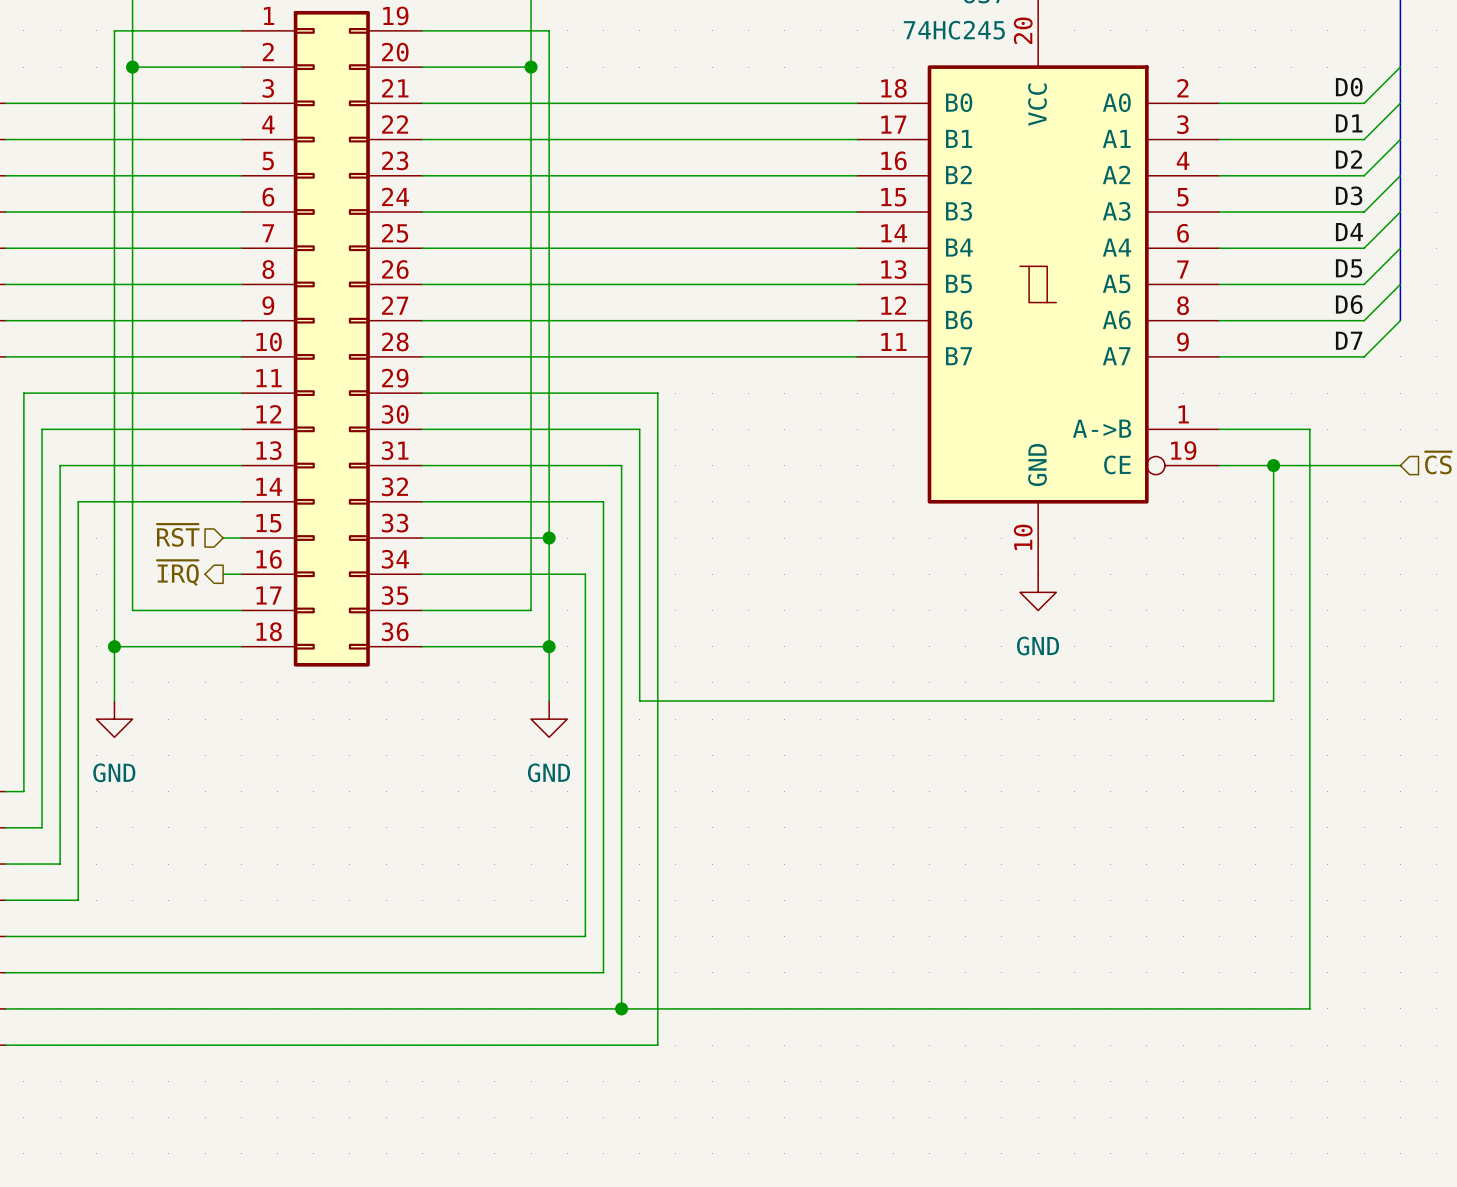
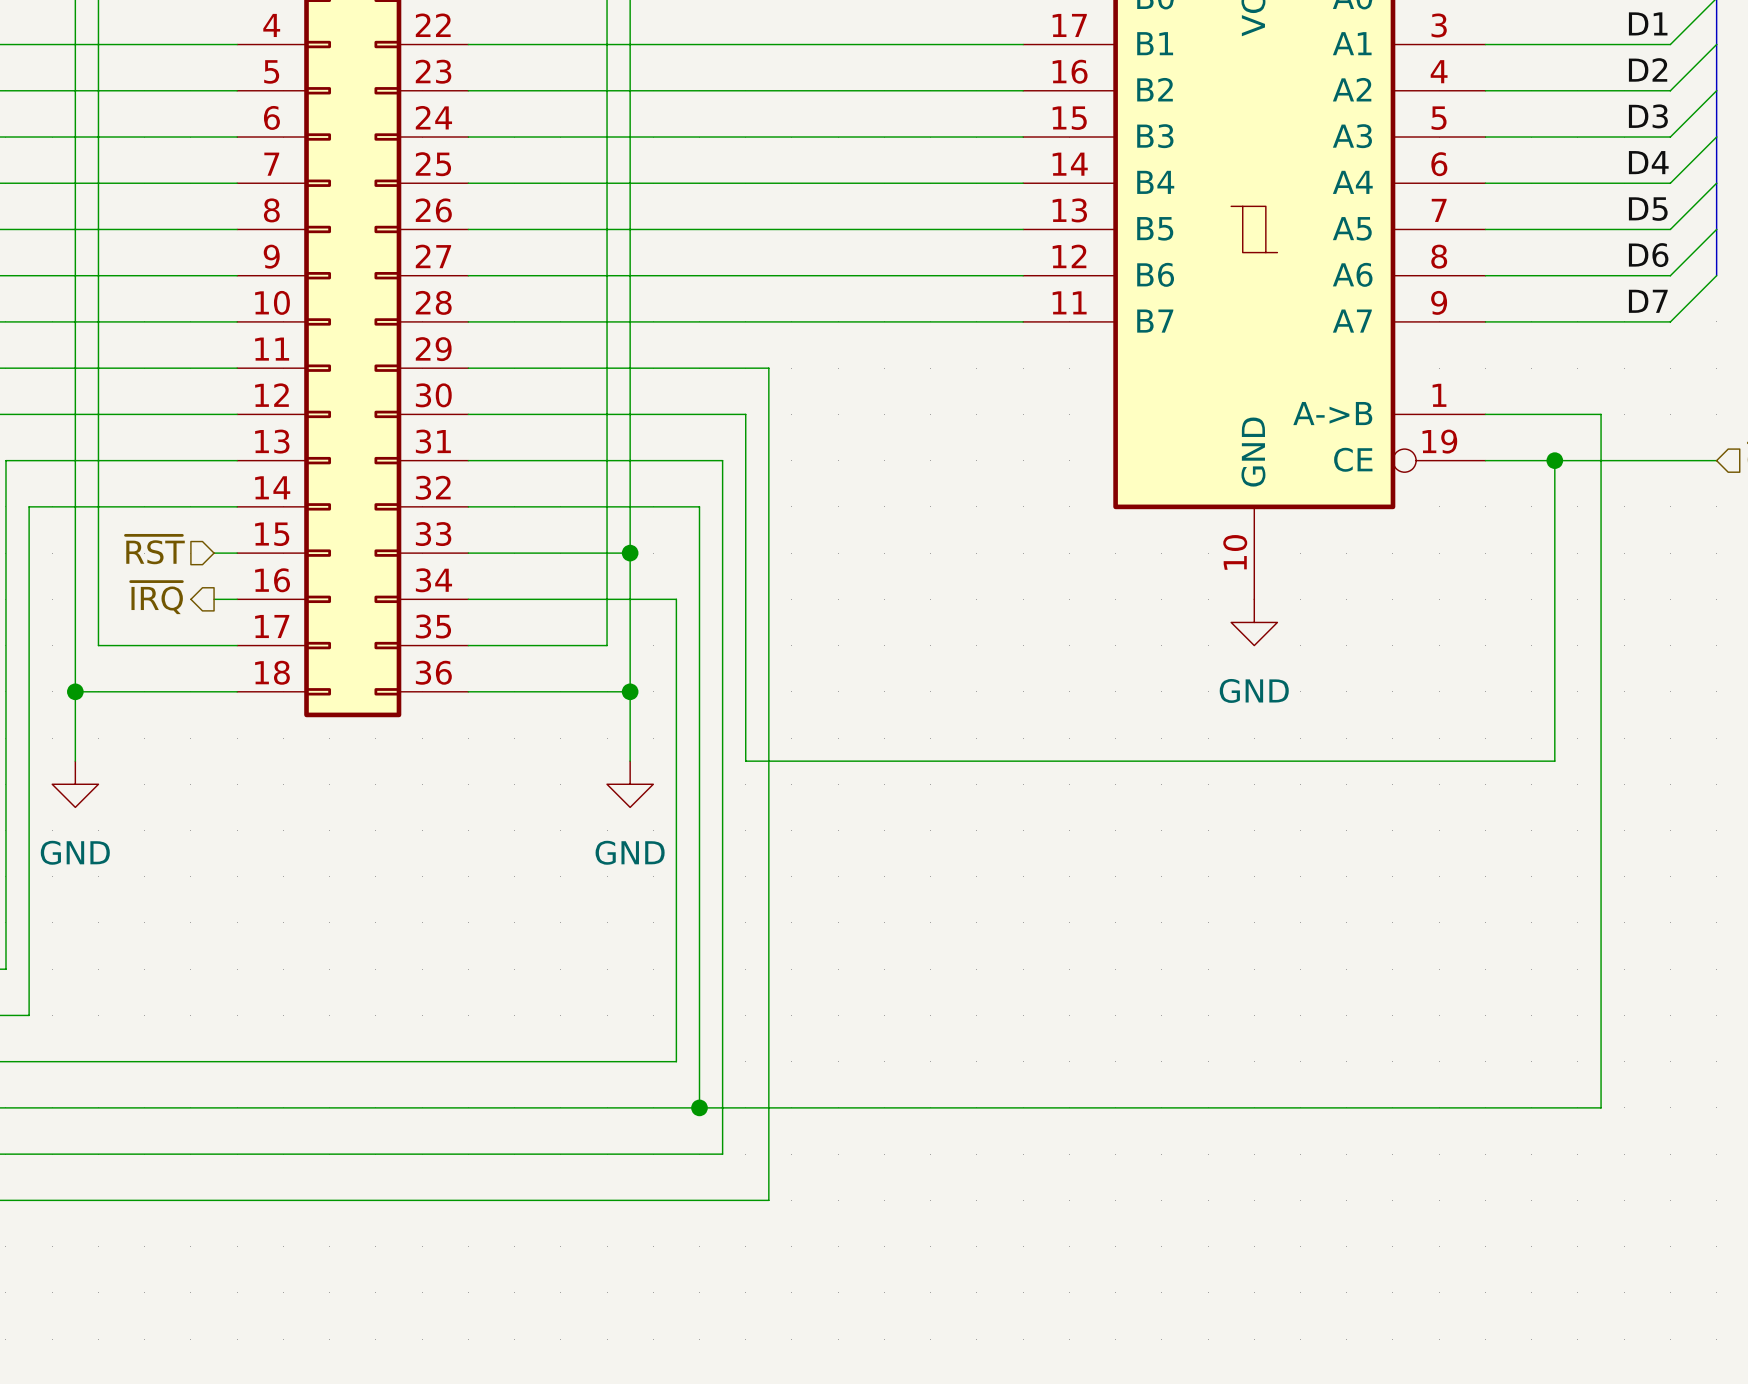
wire: (1309, 972) (1309, 1008) (621, 1008) -> (1601, 1107) (699, 1107)
junction position: (621, 1008) -> (699, 1107)

